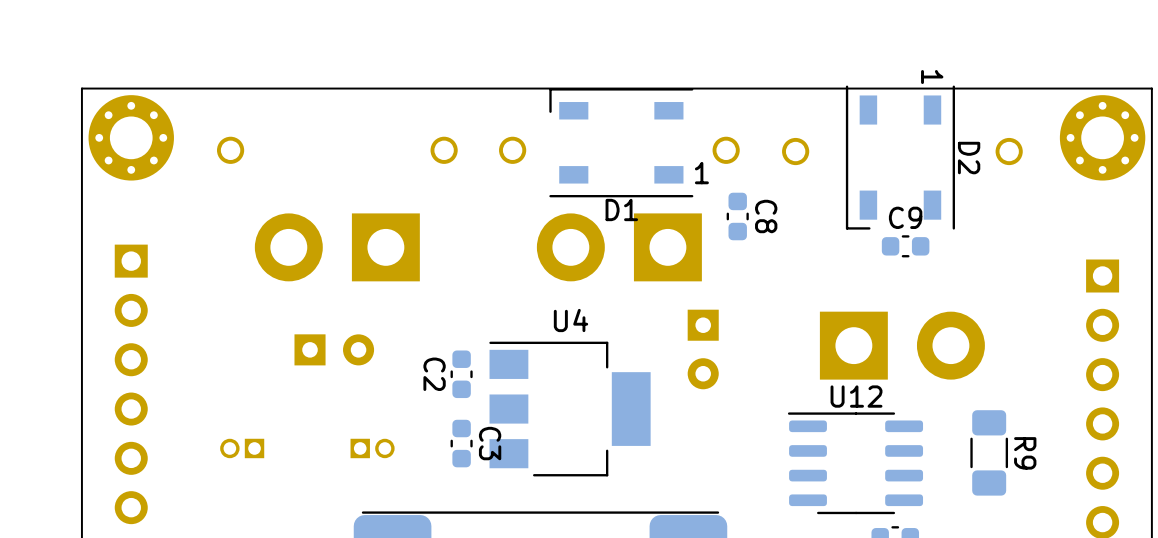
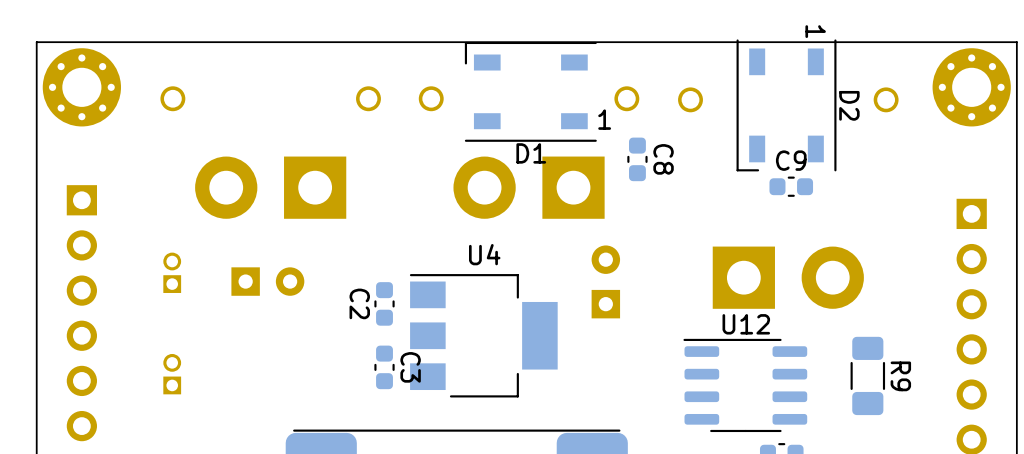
part rotation: 0° (703, 349) -> 180° (605, 281)
part rotation: 0° (242, 448) -> 90° clockwise (172, 374)
part rotation: 0° (372, 448) -> 90° counterclockwise (172, 272)
part position: (372, 448) -> (172, 272)

